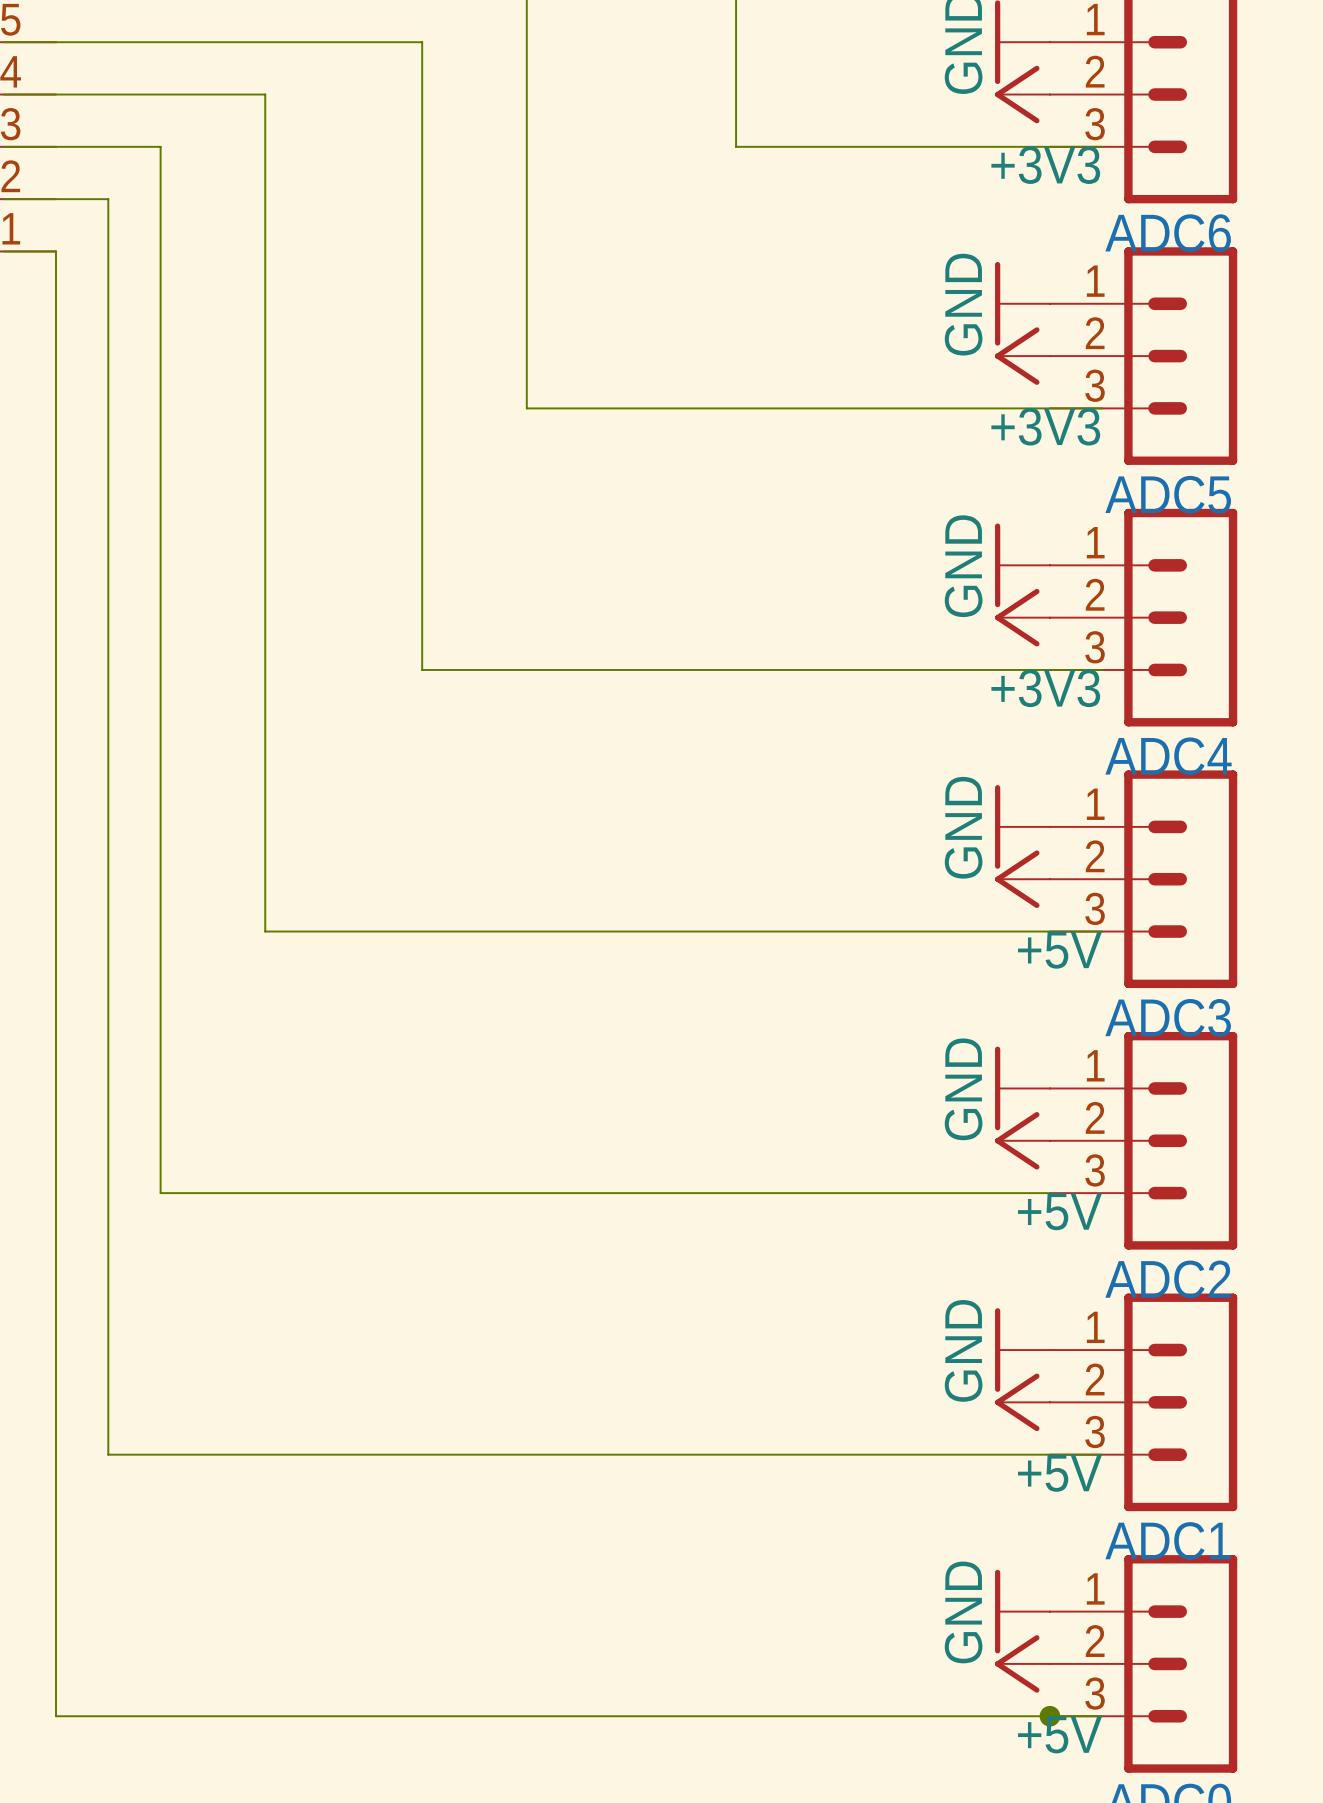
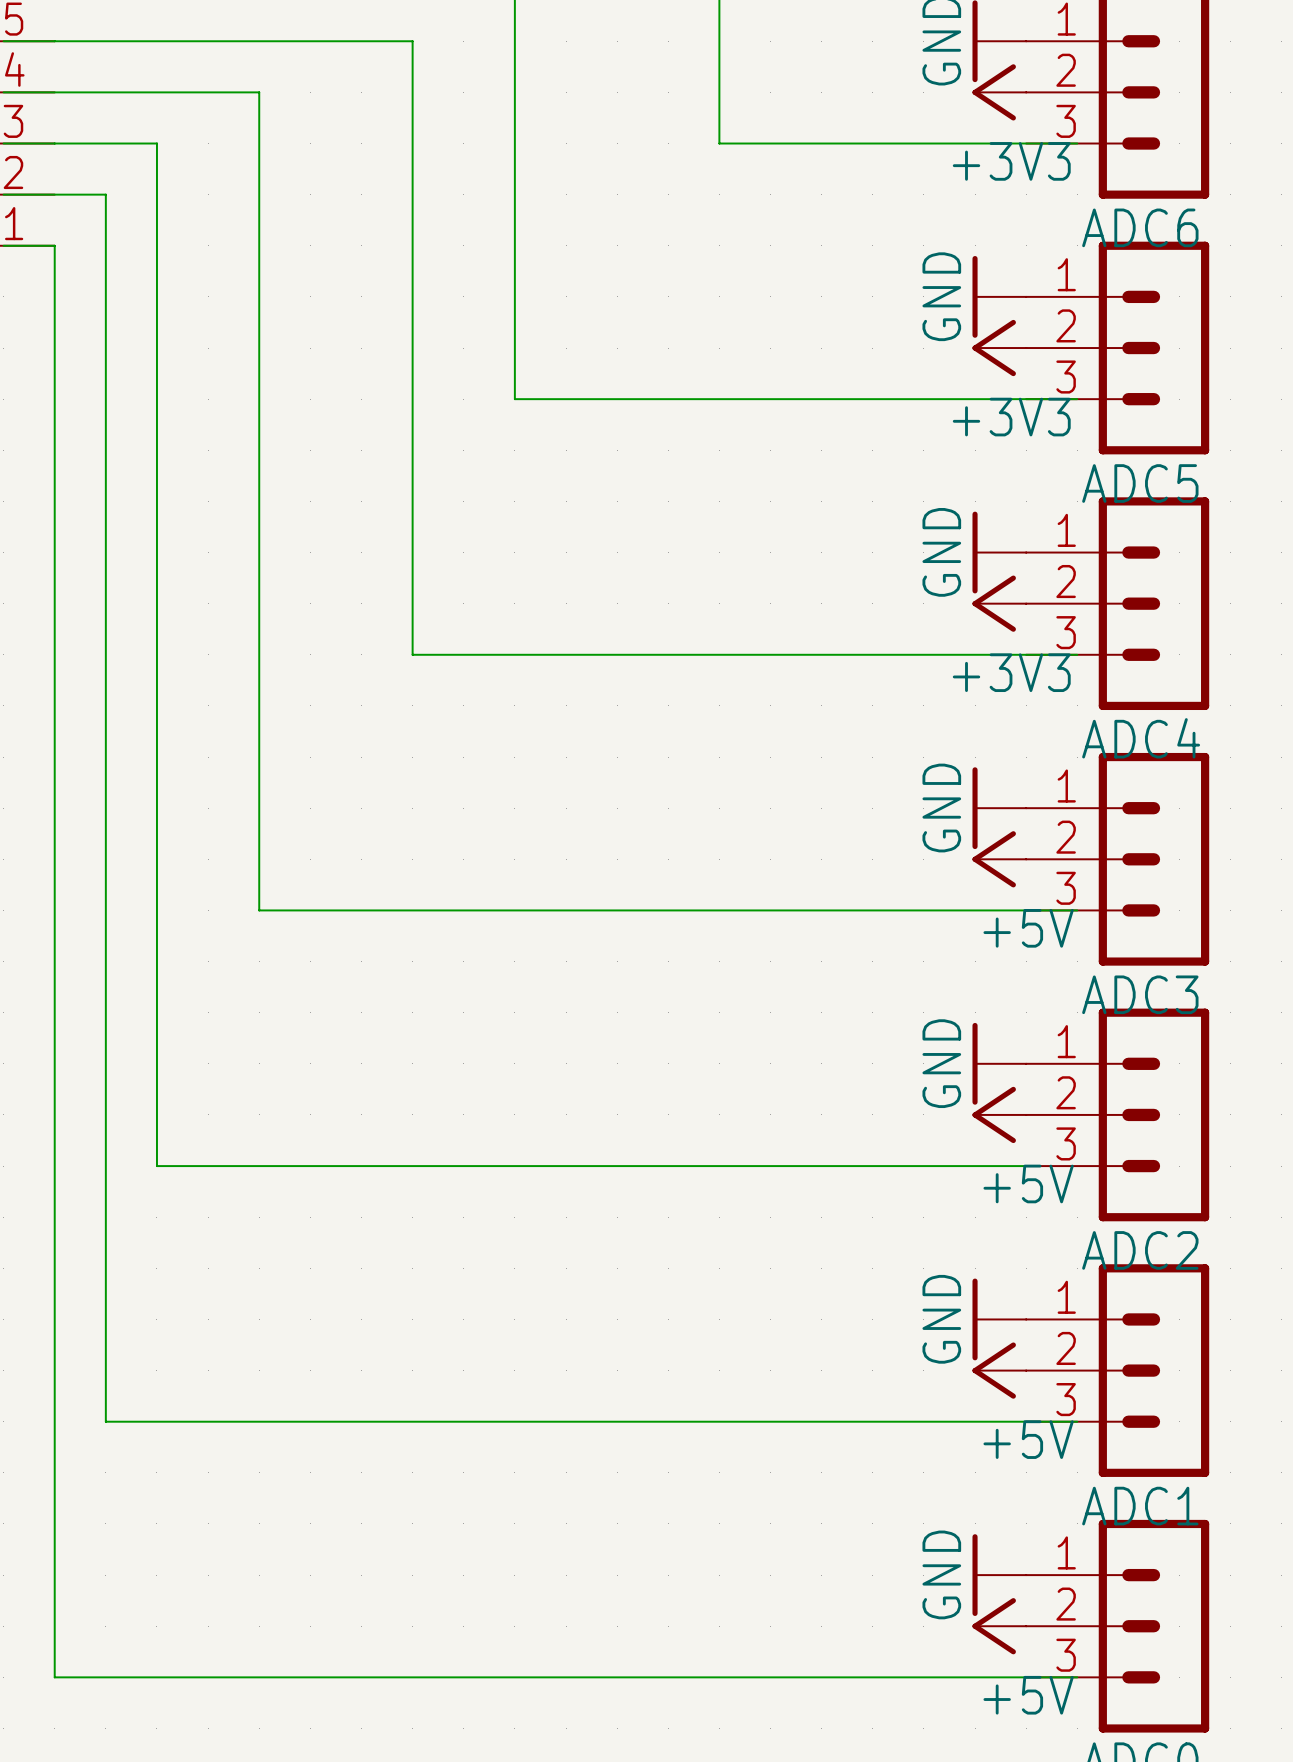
junction: (1049, 1716) -> none

